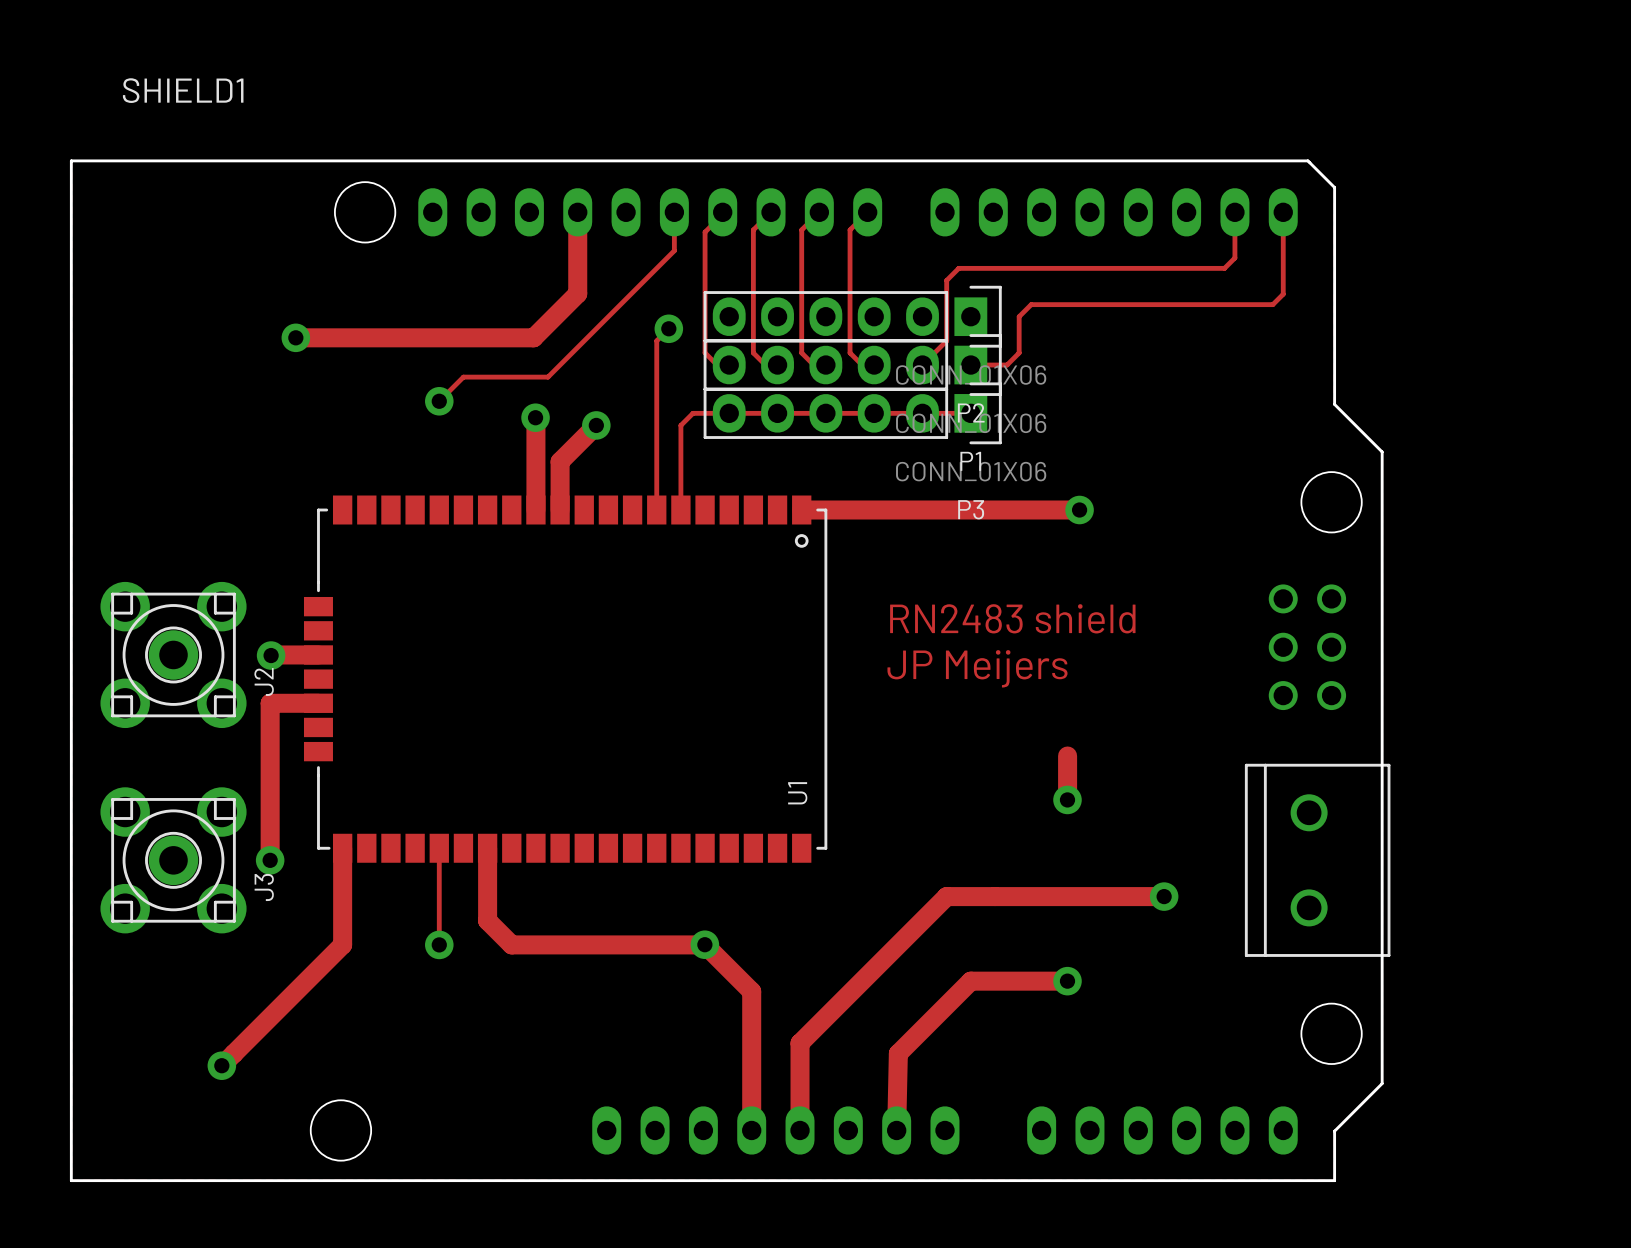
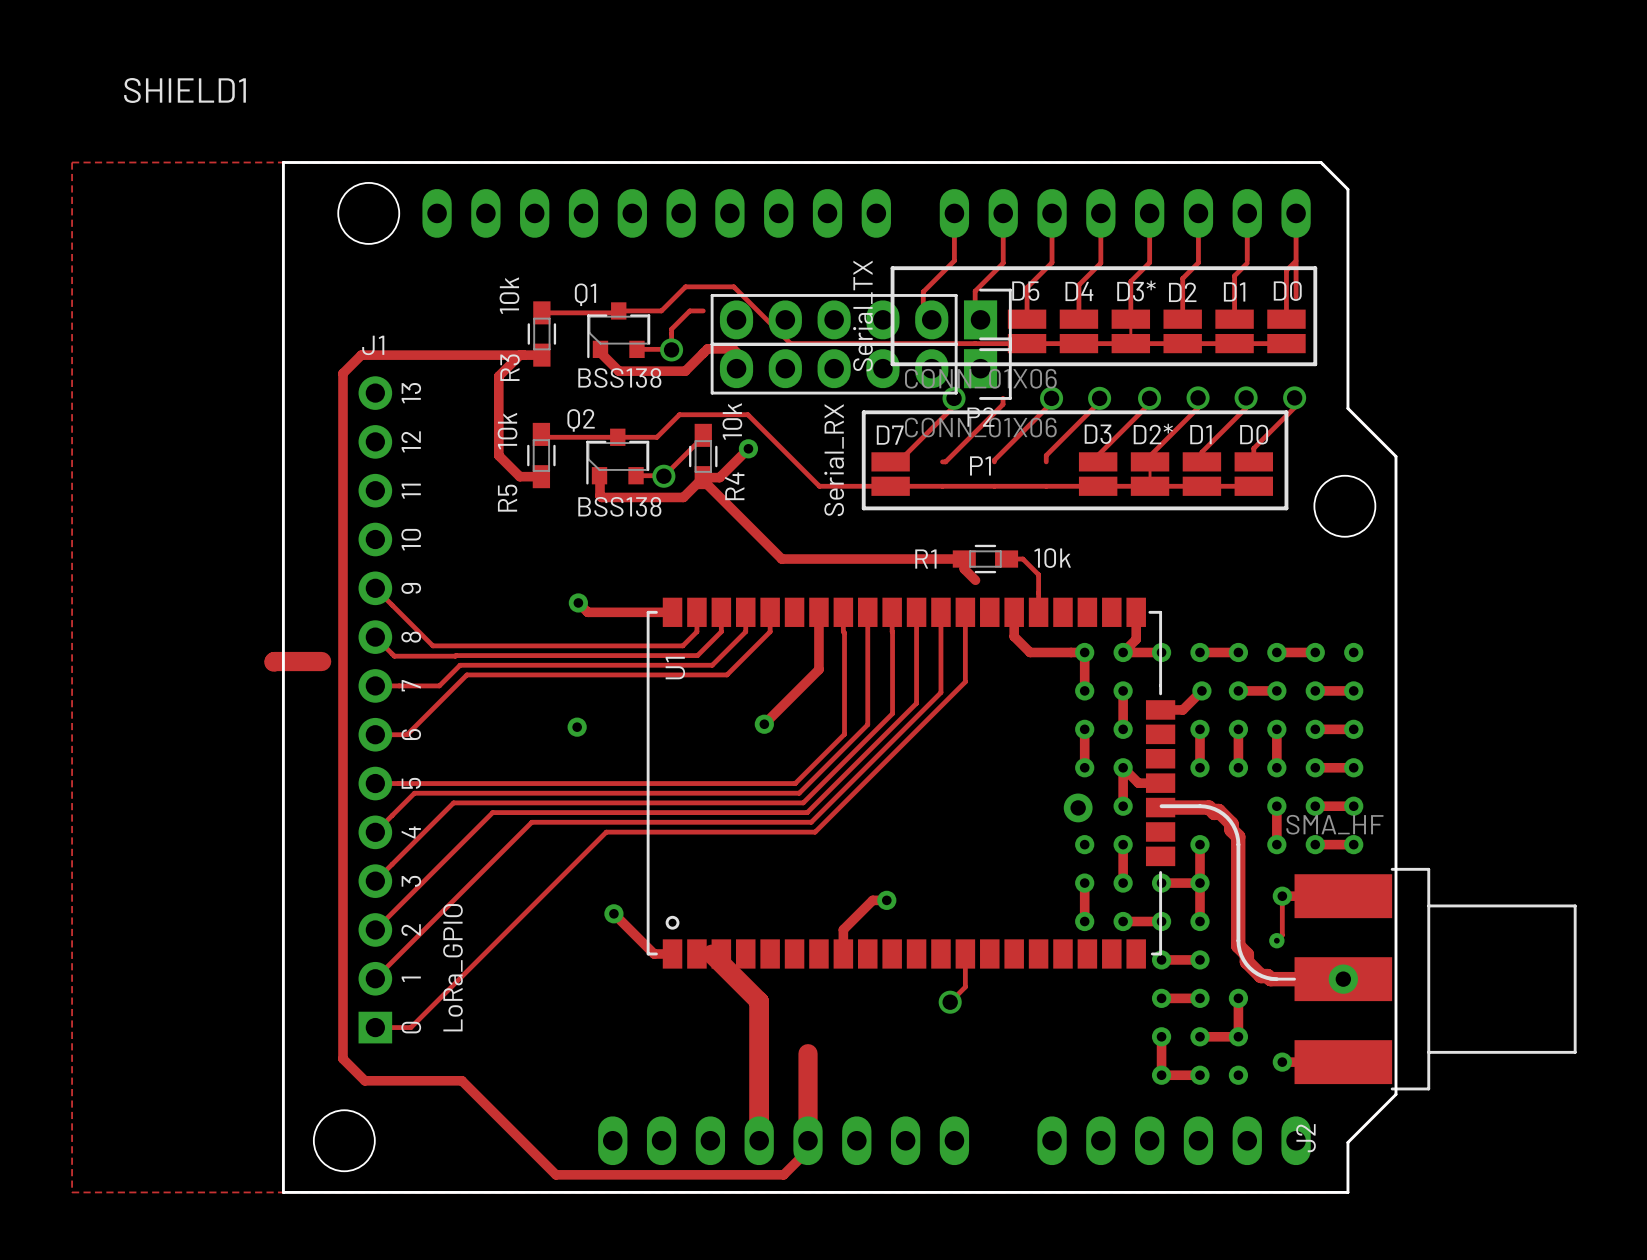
board edge: (280, 160) (71, 160) (71, 1180) (280, 1180) -> (283, 162) (283, 1192)
SHIELD1 footprint: [310, 182, 1362, 1161] -> [313, 182, 1376, 1172]
track: none -> (954, 213) (954, 260) (923, 291) (923, 319)
track: none -> (1003, 213) (1003, 263) (975, 291) (975, 319)
track: none -> (1052, 213) (1052, 262) (1027, 287) (1027, 319)
track: none -> (1100, 213) (1100, 263) (1078, 284) (1078, 319)
track: none -> (1149, 213) (1149, 262) (1130, 281) (1130, 319)
track: none -> (1198, 213) (1198, 262) (1182, 278) (1182, 319)
track: (577, 212) (577, 293) (533, 337) (295, 337) -> none
track: (674, 212) (674, 250) (548, 377) (463, 377) (439, 401) -> none
track: (722, 212) (705, 232) (705, 352) (717, 365) (729, 365) -> none
track: (771, 212) (753, 229) (753, 352) (765, 365) (777, 365) -> none
track: (819, 212) (801, 229) (801, 352) (813, 365) (825, 365) -> none
track: (867, 226) (867, 212) (850, 229) (850, 352) (862, 365) (874, 365) -> none
track: (1234, 257) (1224, 268) (958, 268) (946, 280) (946, 340) (922, 365) -> none
track: none -> (1296, 260) (1286, 270) (1286, 319)
track: none -> (1247, 263) (1234, 275) (1234, 319)
line: none -> (892, 268) (1315, 268) (1315, 364) (892, 364) (892, 268)
track: (1283, 294) (1272, 304) (1031, 304) (1019, 316) (1019, 352) (1007, 365) (970, 365) -> none
track: none -> (703, 310) (689, 310) (671, 329) (671, 349) (636, 349)
track: none -> (541, 312) (661, 310) (685, 286) (733, 286) (790, 343) (1286, 343)
text: none -> Serial_TX (862, 316)
Q1: none -> BSS138 (618, 330)
track: (668, 328) (656, 340) (656, 510) -> none
via position: (668, 328) -> (671, 349)
D5: none -> (1027, 331)
D4: none -> (1078, 331)
D3*: none -> (1130, 331)
D2: none -> (1182, 331)
D1: none -> (1234, 331)
D0: none -> (1286, 331)
R3: none -> 10k (541, 334)
via: (295, 337) -> none
track: none -> (600, 349) (600, 353) (618, 371) (685, 371) (707, 348) (733, 348) (742, 358)
track: none -> (519, 355) (498, 376) (498, 455) (519, 476) (541, 476)
track: none -> (541, 355) (361, 355) (342, 373) (342, 1058) (364, 1080) (461, 1080) (555, 1174) (783, 1174) (808, 1150)
track: none -> (1198, 397) (1198, 407) (1150, 455) (1150, 461)
via: none -> (1198, 397)
track: none -> (1246, 397) (1246, 408) (1201, 452) (1201, 461)
via: none -> (1246, 397)
track: none -> (1294, 397) (1294, 407) (1253, 448) (1253, 461)
via: none -> (1294, 397)
track: none -> (954, 398) (954, 406) (898, 461) (890, 461)
via: none -> (954, 398)
track: none -> (1003, 398) (1003, 404) (945, 461) (942, 461)
track: none -> (1051, 398) (1051, 403) (994, 461)
via: none -> (1051, 398)
track: none -> (1099, 398) (1099, 402) (1046, 455) (1046, 461)
via: none -> (1099, 398)
track: none -> (1149, 398) (1149, 403) (1098, 455) (1098, 461)
via: none -> (1149, 398)
via: (439, 401) -> none
line: none -> (863, 412) (1286, 412) (1286, 508) (863, 508) (863, 412)
P3: CONN_01X06 (852, 413) -> none
track: (970, 413) (692, 413) (680, 425) (680, 510) -> none
track: (535, 417) (535, 510) -> none
via: (535, 417) -> none
track: (596, 425) (560, 461) (560, 510) -> none
via: (596, 425) -> none
track: none -> (541, 434) (544, 437) (656, 437) (679, 414) (747, 414) (819, 486) (1253, 486)
track: none -> (703, 435) (663, 476) (636, 475)
track: none -> (748, 448) (719, 477) (703, 477)
via: none -> (748, 448)
R5: none -> 10k (541, 455)
R4: none -> 10k (703, 456)
Q2: none -> BSS138 (617, 456)
text: none -> Serial_RX (834, 460)
D7: none -> (890, 474)
D3: none -> (1098, 474)
D2*: none -> (1150, 474)
D1: none -> (1201, 474)
D0: none -> (1253, 474)
track: none -> (599, 475) (601, 497) (683, 497) (703, 477)
via: none -> (663, 476)
track: none -> (703, 477) (703, 480) (781, 559) (964, 559) (964, 569) (975, 580)
track: (801, 510) (1079, 510) -> none
via: (1079, 510) -> none
R1: none -> 10k (985, 559)
track: none -> (1006, 559) (1022, 559) (1038, 574) (1038, 612)
J2 footprint: [100, 581, 247, 729] -> [1268, 867, 1577, 1091]
track: none -> (375, 588) (432, 645) (682, 645) (696, 631) (696, 612)
track: none -> (578, 602) (587, 612) (672, 612)
via: none -> (578, 602)
track: none -> (721, 612) (721, 631) (697, 655) (394, 656) (375, 637)
track: none -> (745, 612) (745, 631) (712, 665) (460, 665) (439, 685) (375, 685)
track: none -> (770, 612) (770, 631) (726, 674) (466, 674) (407, 734) (375, 734)
track: none -> (818, 612) (818, 669) (764, 724)
track: none -> (843, 612) (844, 734) (795, 783) (375, 783)
track: none -> (867, 612) (867, 724) (799, 793) (414, 793) (375, 832) (366, 832)
track: none -> (892, 612) (892, 713) (803, 802) (453, 802) (375, 881)
track: none -> (916, 612) (916, 703) (807, 812) (492, 812) (375, 929)
track: none -> (940, 612) (940, 692) (811, 822) (531, 822) (375, 978)
track: none -> (965, 612) (965, 681) (815, 832) (606, 832) (410, 1027) (375, 1027)
track: none -> (1014, 612) (1014, 636) (1030, 652) (1084, 652) (1084, 690)
track: none -> (1136, 612) (1136, 639) (1123, 652) (1161, 652)
text: RN2483 shield (1012, 618) -> none
via: none -> (1084, 652)
via: none -> (1123, 652)
via: none -> (1161, 652)
track: none -> (1199, 652) (1238, 652)
via: none -> (1199, 652)
via: none -> (1238, 652)
track: none -> (1276, 652) (1315, 652)
via: none -> (1276, 652)
via: none -> (1315, 652)
via: none -> (1353, 652)
via: (271, 655) -> none
text: JP Meijers (977, 668) -> none
U1 rotation: 0° (565, 679) -> 180° (910, 783)
U1 position: (565, 679) -> (910, 783)
J2 name position: J2 (264, 682) -> J2 (1306, 1138)
via: none -> (1084, 690)
track: none -> (1123, 690) (1123, 729)
via: none -> (1123, 690)
track: none -> (1201, 690) (1182, 709) (1160, 709)
via: none -> (1201, 690)
track: none -> (1238, 690) (1276, 690)
via: none -> (1238, 690)
via: none -> (1276, 690)
track: none -> (1315, 690) (1353, 690)
via: none -> (1315, 690)
via: none -> (1353, 690)
J1: none -> LoRa_GPIO (375, 709)
track: (318, 703) (270, 703) (270, 860) -> none
via: none -> (764, 724)
via: none -> (577, 727)
track: none -> (1084, 729) (1084, 767)
via: none -> (1084, 729)
via: none -> (1123, 729)
track: none -> (1199, 729) (1199, 767)
via: none -> (1199, 729)
track: none -> (1238, 729) (1238, 767)
via: none -> (1238, 729)
track: none -> (1276, 729) (1276, 767)
via: none -> (1276, 729)
track: none -> (1315, 729) (1353, 729)
via: none -> (1315, 729)
via: none -> (1353, 729)
track: (1067, 755) (1067, 801) (1067, 799) -> none
via: none -> (1084, 767)
via: none -> (1123, 767)
via: none -> (1199, 767)
via: none -> (1238, 767)
via: none -> (1276, 767)
track: none -> (1315, 767) (1353, 767)
via: none -> (1315, 767)
via: none -> (1353, 767)
track: none -> (1160, 783) (1138, 783) (1123, 767) (1123, 806)
via: none -> (1123, 806)
line: none -> (1161, 806) (1209, 807) (1223, 814) (1233, 825) (1238, 844) (1239, 950) (1246, 964) (1253, 971) (1266, 977) (1276, 979)
track: none -> (1276, 806) (1276, 844)
via: none -> (1276, 806)
track: none -> (1315, 806) (1353, 806)
via: none -> (1315, 806)
via: none -> (1353, 806)
track: none -> (1160, 807) (1209, 807) (1214, 812) (1218, 811) (1231, 823) (1231, 830) (1238, 836) (1238, 945) (1246, 954) (1246, 961) (1261, 976) (1267, 976) (1270, 979) (1343, 979)
J2 value: none -> SMA_HF (1334, 824)
via: none -> (1084, 844)
track: none -> (1123, 844) (1123, 883)
via: none -> (1123, 844)
track: none -> (1199, 844) (1199, 921)
via: none -> (1199, 844)
via: none -> (1276, 844)
track: none -> (1315, 844) (1353, 844)
via: none -> (1315, 844)
via: none -> (1353, 844)
track: (342, 848) (342, 944) (221, 1065) -> none
track: (439, 848) (439, 944) -> none
track: (487, 848) (487, 920) (511, 944) (705, 944) -> none
J3: (173, 860) -> none
via: (270, 860) -> none
part: (1317, 860) -> none
track: none -> (1084, 883) (1084, 921)
via: none -> (1084, 883)
via: none -> (1123, 883)
track: none -> (1161, 883) (1199, 883)
via: none -> (1161, 883)
via: none -> (1199, 883)
track: none -> (1282, 896) (1282, 935) (1276, 940)
track: none -> (886, 900) (872, 900) (843, 929) (843, 953)
via: none -> (886, 900)
track: (1164, 896) (946, 896) (800, 1043) -> none
via: (1164, 896) -> none
track: none -> (613, 913) (654, 953) (672, 953)
via: none -> (613, 913)
via: none -> (1084, 921)
track: none -> (1123, 921) (1161, 921)
via: none -> (1123, 921)
via: none -> (1161, 921)
via: none -> (1199, 921)
via: none -> (1276, 940)
via: (439, 944) -> none
via: (704, 944) -> none
track: none -> (965, 953) (965, 987) (950, 1002)
track: none -> (1161, 959) (1199, 959)
via: none -> (1161, 959)
via: none -> (1199, 959)
track: (1067, 981) (970, 981) (898, 1053) (896, 1130) -> none
via: (1067, 981) -> none
track: none -> (1161, 998) (1199, 998)
via: none -> (1161, 998)
via: none -> (1199, 998)
track: none -> (1238, 998) (1238, 1036) (1199, 1036)
via: none -> (1238, 998)
via: none -> (950, 1002)
track: none -> (1161, 1036) (1161, 1075) (1199, 1075)
via: none -> (1161, 1036)
via: none -> (1199, 1036)
via: none -> (1238, 1036)
via: none -> (1161, 1075)
via: none -> (1199, 1075)
via: none -> (1238, 1075)
via: (221, 1065) -> none

